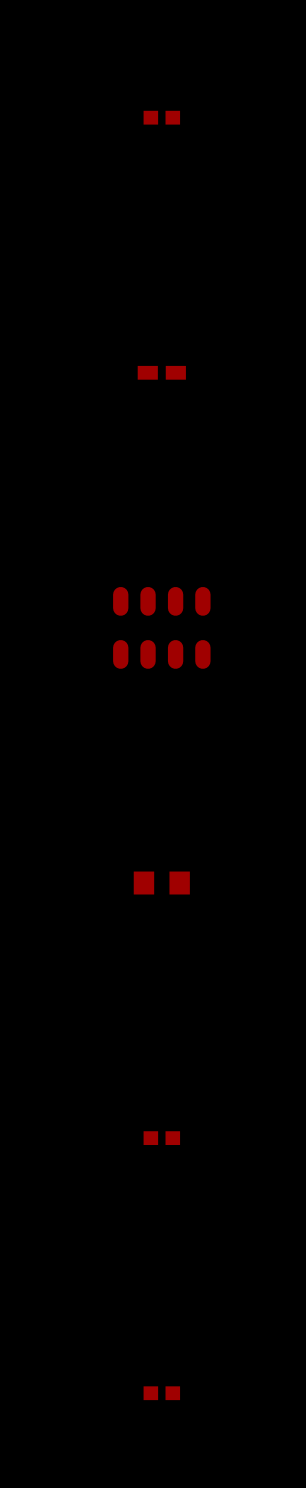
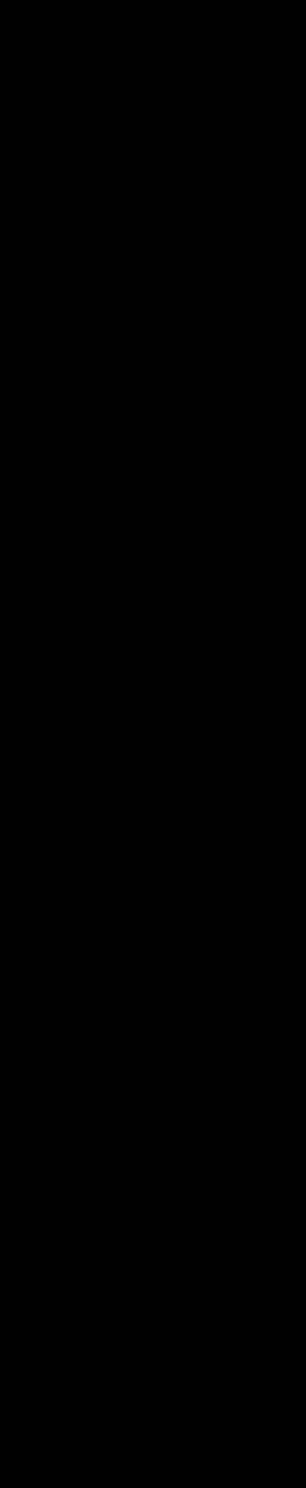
part: (161, 117) -> none
part: (161, 372) -> none
part: (161, 627) -> none
part: (161, 883) -> none
part: (161, 1138) -> none
part: (161, 1393) -> none

